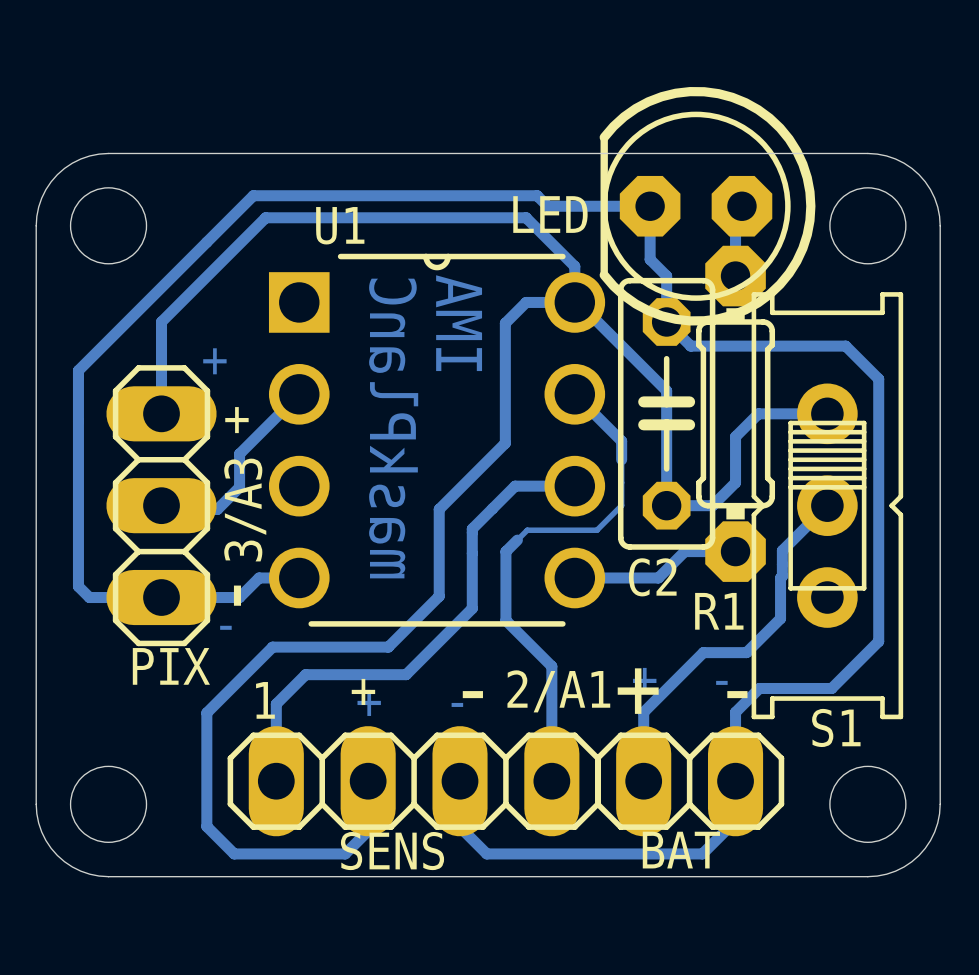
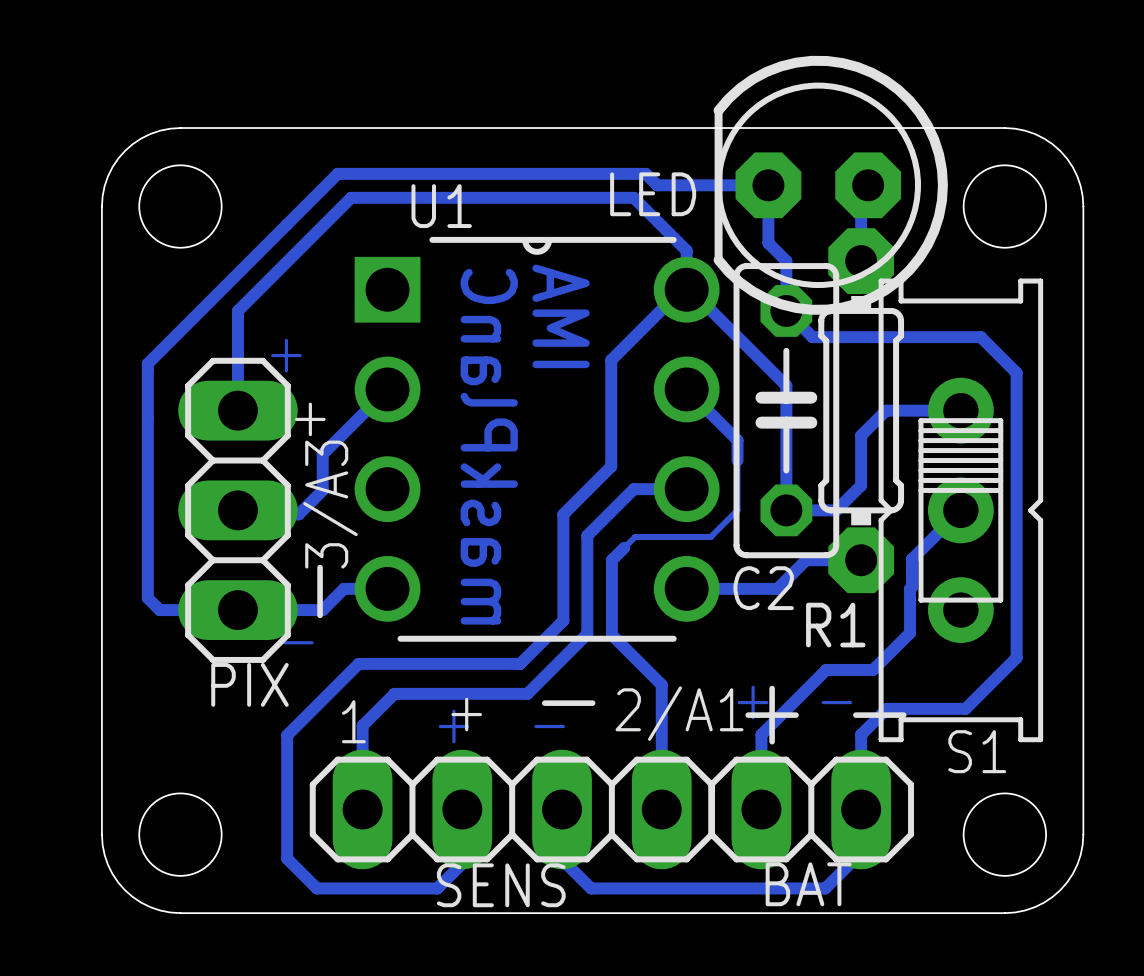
bottom track: (570, 302) (526, 302) (505, 323) (505, 367) -> (681, 289) (611, 360)
bottom track: (505, 443) (439, 509) (439, 596) (388, 647) -> (611, 442) (611, 466) (563, 514) (563, 620) (520, 663) (484, 663)
bottom track: (526, 486) (515, 486) (472, 528) (472, 608) (406, 674) -> (633, 489) (587, 535) (587, 634) (527, 693) (503, 693)
text position: - (472, 694) -> - (568, 703)

